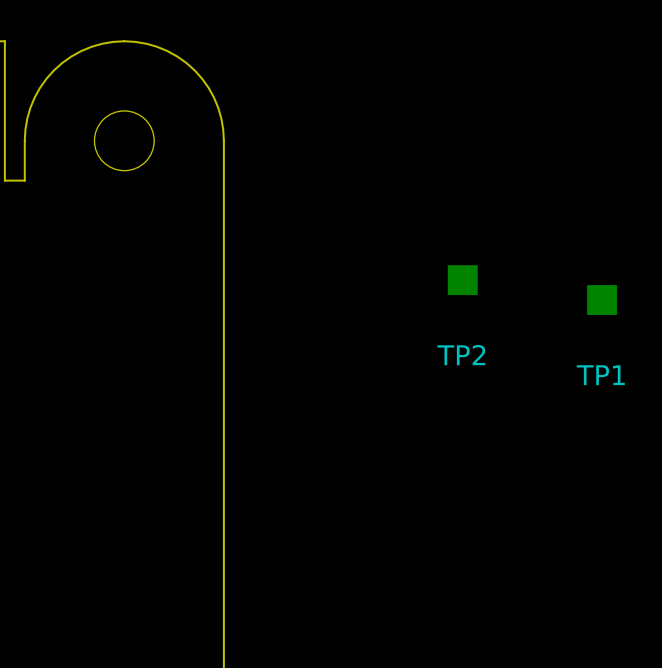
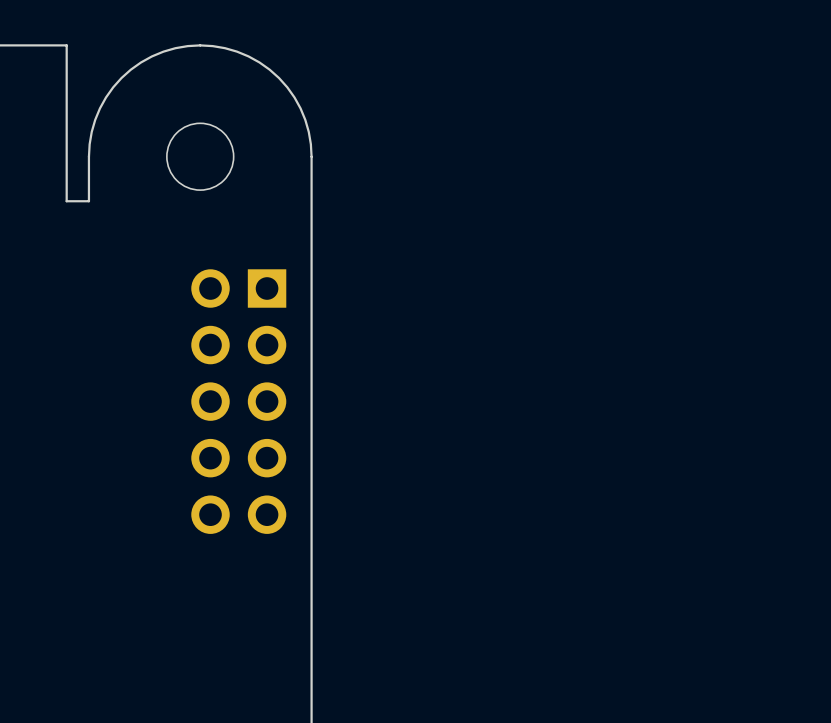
TP2: (462, 280) -> none
TP1: (602, 300) -> none
part: none -> (238, 401)

